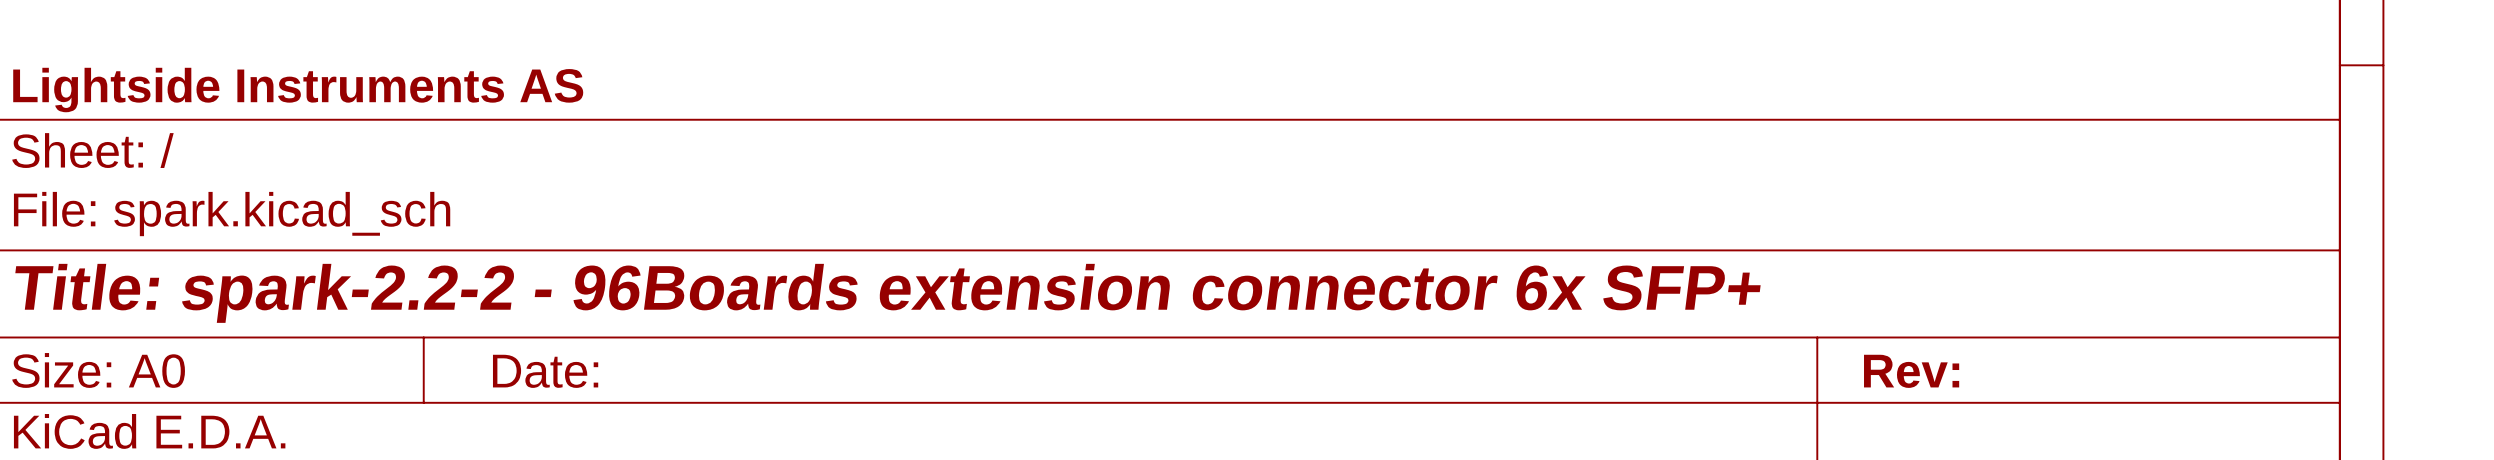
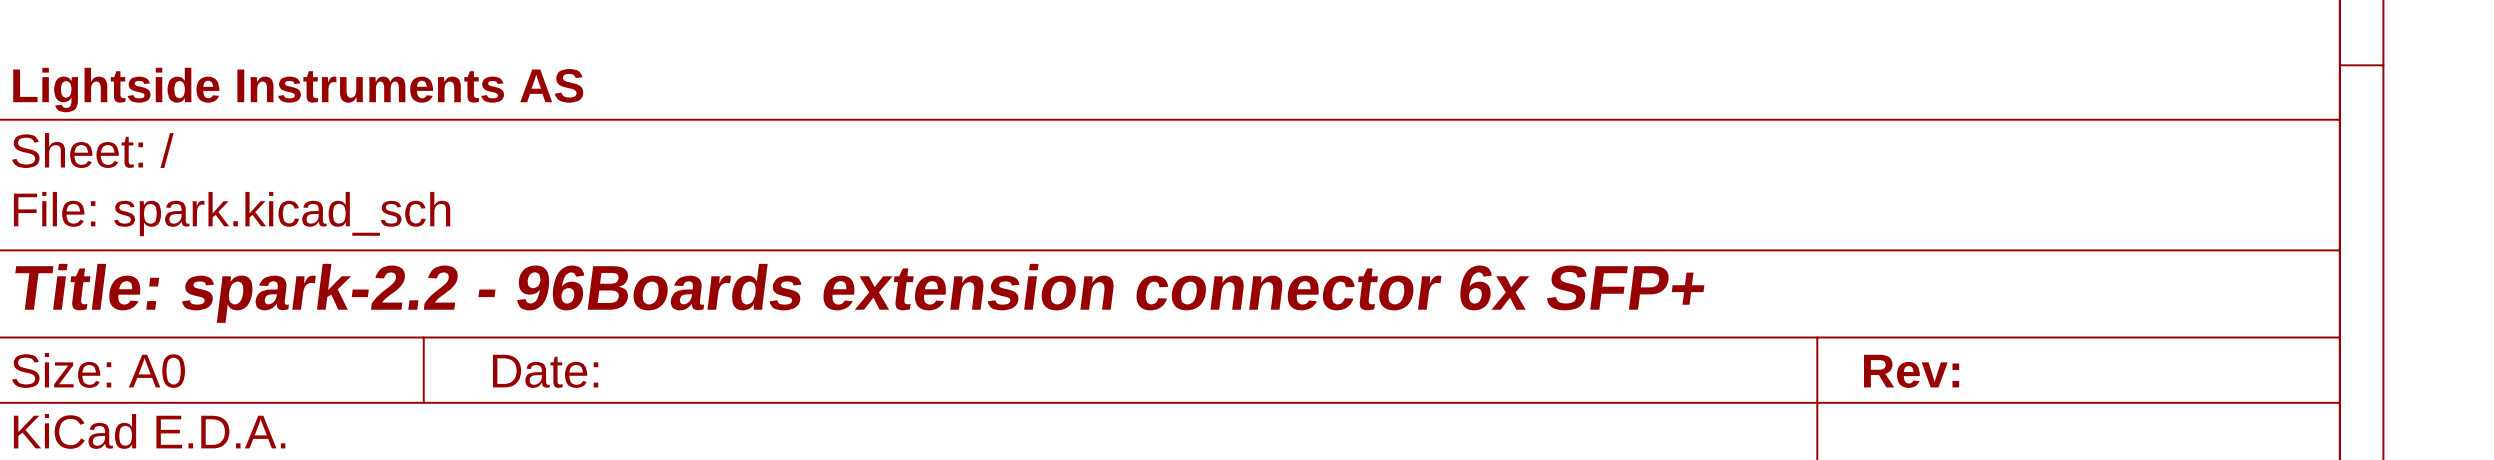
title block: Title: spark-2.2-2 - 96Boards extension connector 6x SFP+ (887, 293) -> Title: spark-2.2 - 96Boards extension connector 6x SFP+ (859, 293)

